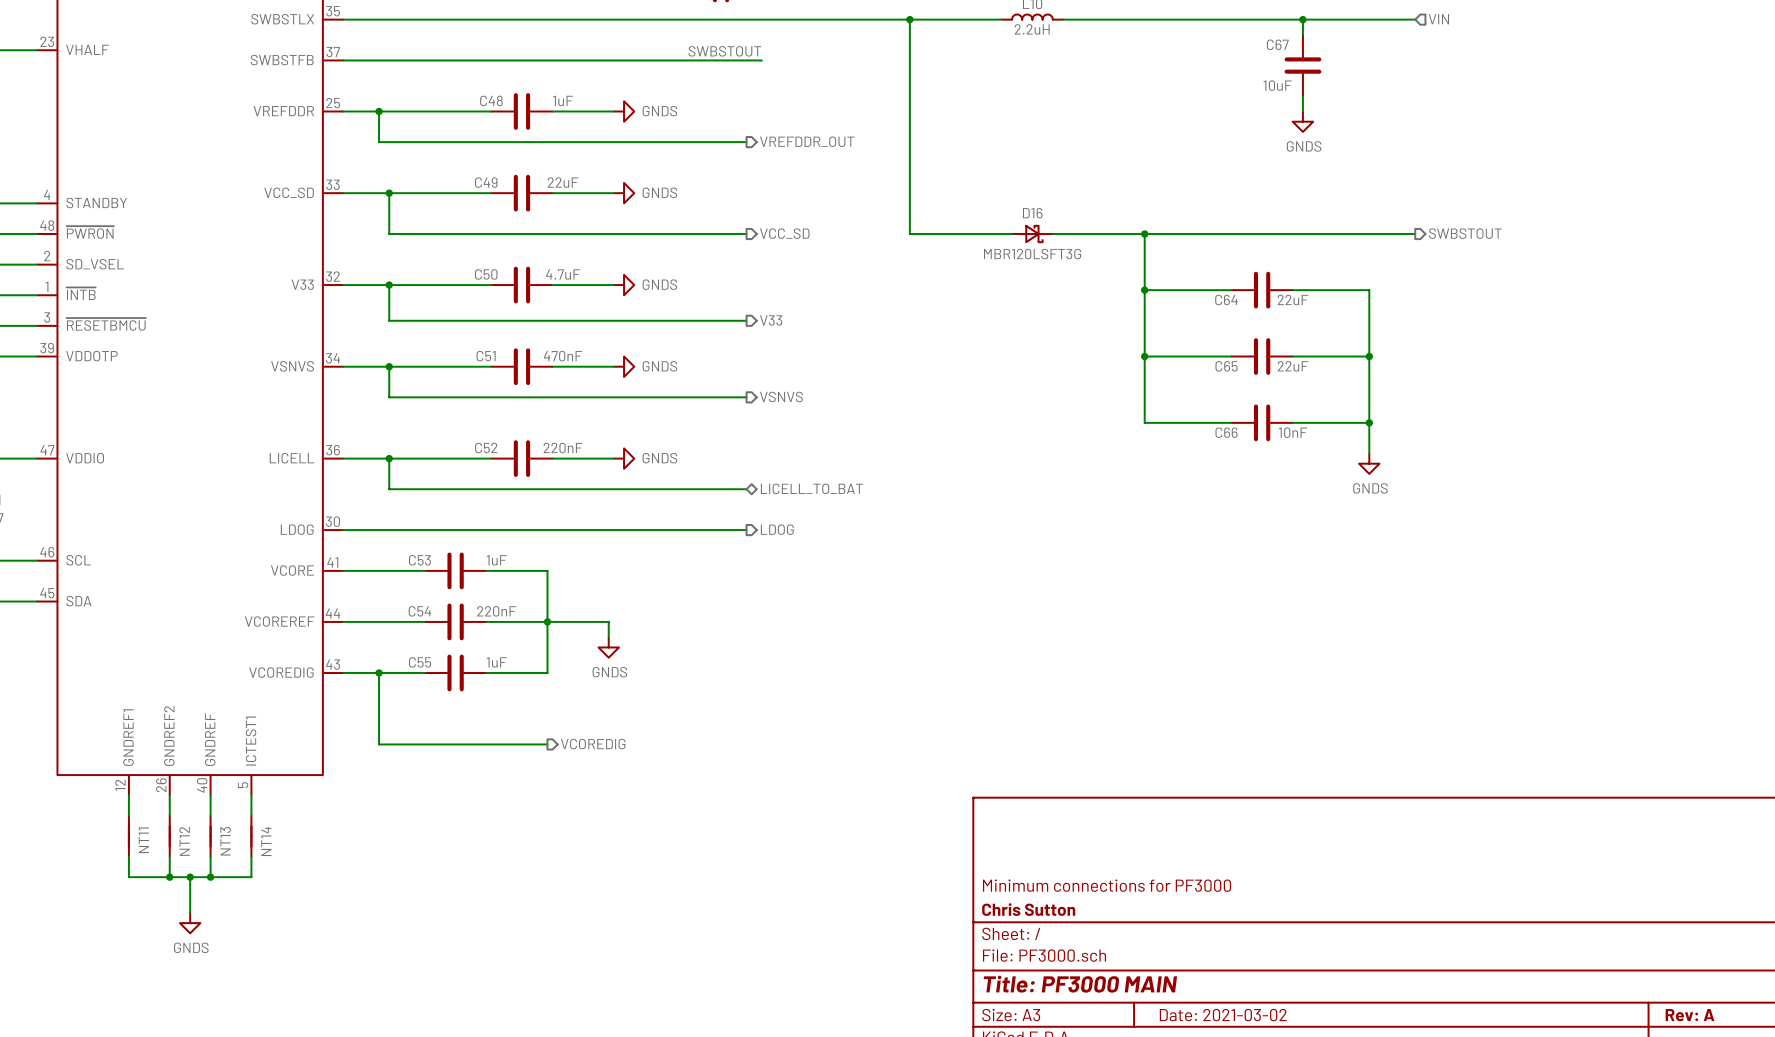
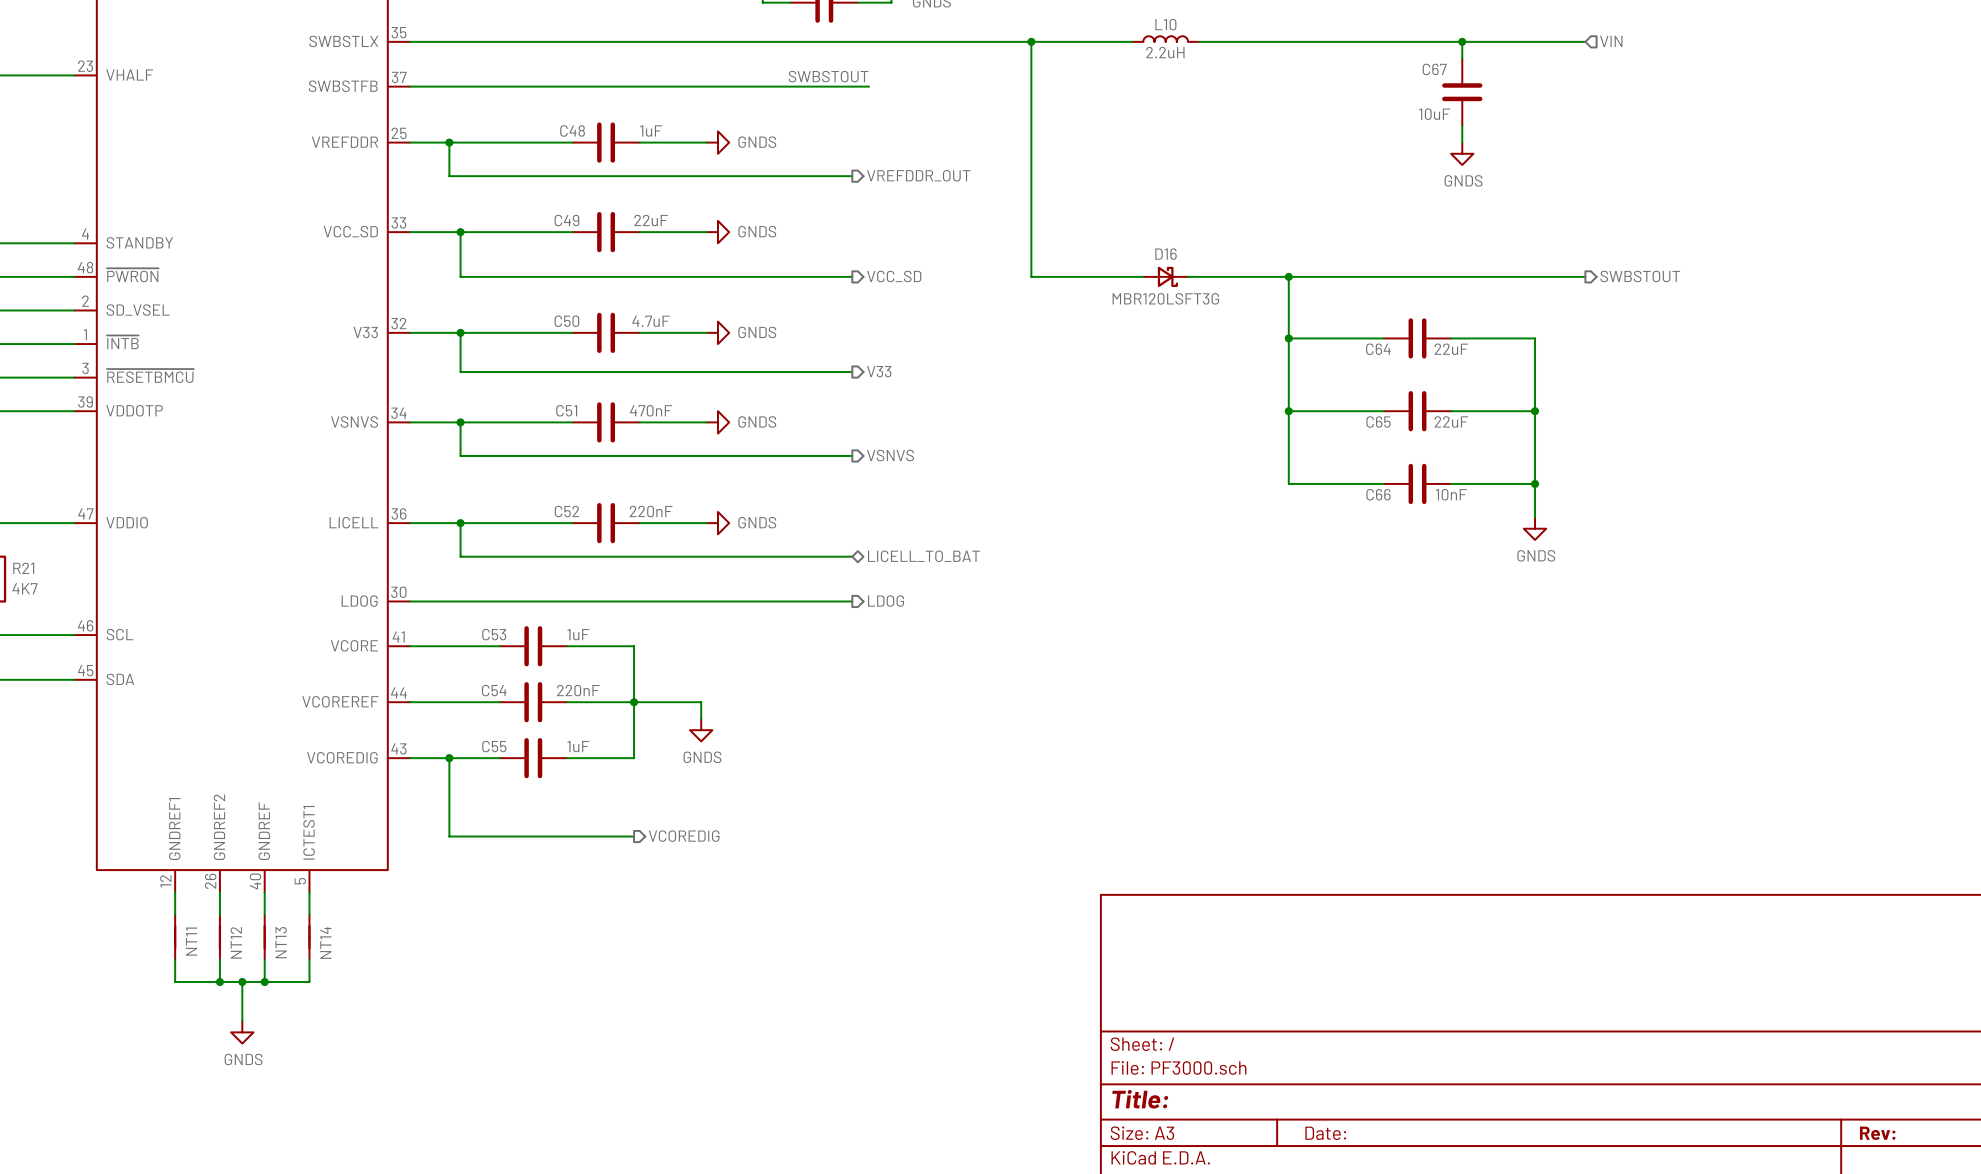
title block: Minimum connections for PF3000 (1107, 885) -> none
title block: Chris Sutton (1028, 909) -> none
title block: Title: PF3000 MAIN (1080, 984) -> Title: (1140, 1099)
title block: Date: 2021-03-02 (1223, 1015) -> Date: (1325, 1133)
title block: Rev: A (1690, 1015) -> Rev: (1877, 1133)

